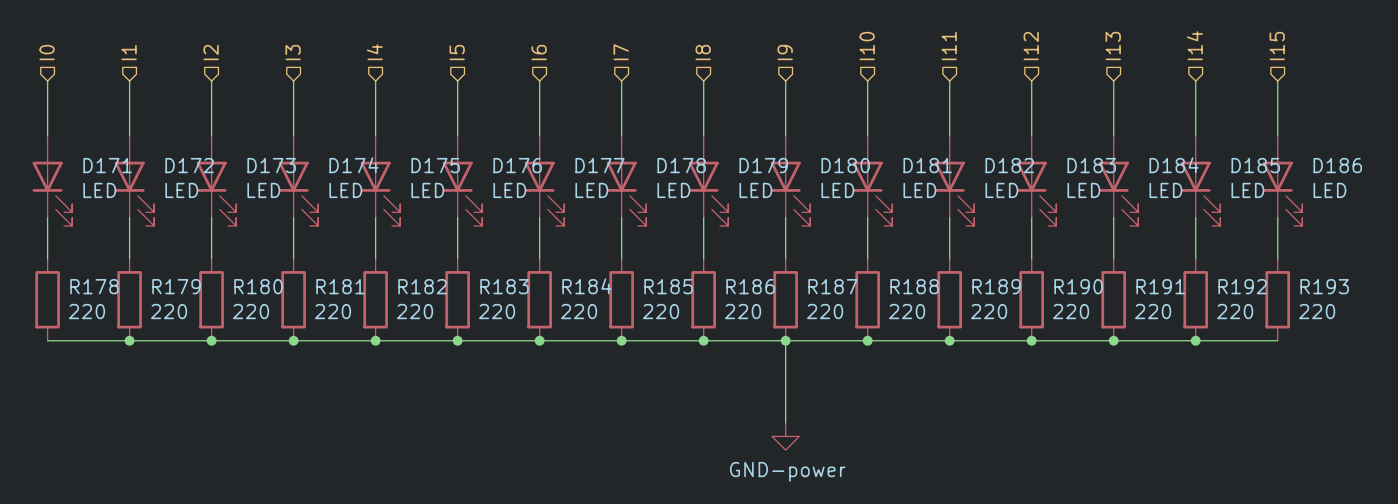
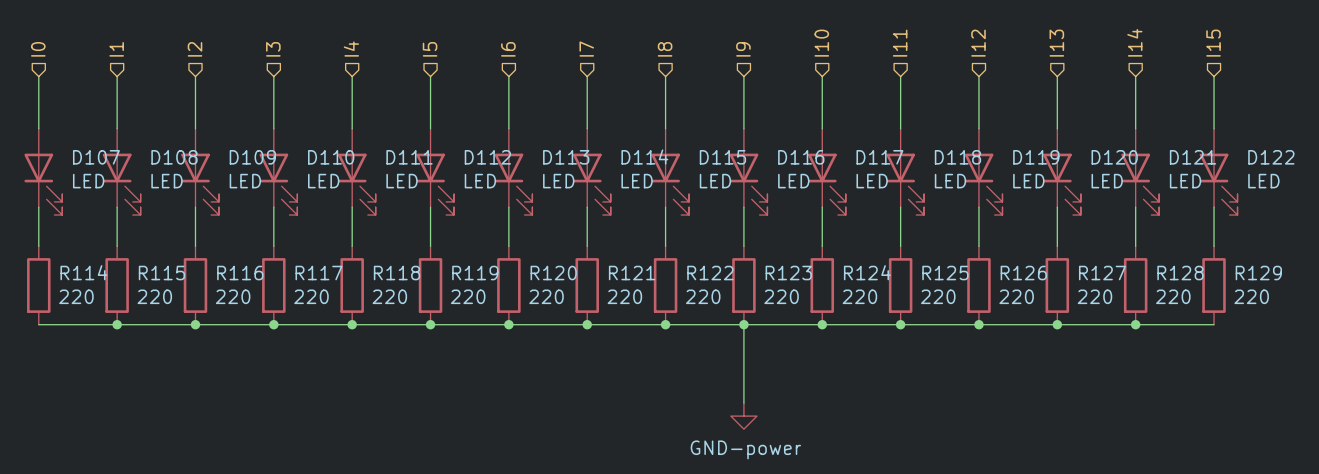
D171 name: D171 (107, 165) -> D107 (96, 157)
D172 name: D172 (189, 165) -> D108 (174, 157)
D173 name: D173 (271, 165) -> D109 (252, 157)
D174 name: D174 (353, 165) -> D110 (331, 157)
D175 name: D175 (435, 165) -> D111 (409, 157)
D176 name: D176 (517, 165) -> D112 (487, 157)
D177 name: D177 (600, 165) -> D113 (566, 157)
D178 name: D178 (681, 165) -> D114 (644, 157)
D179 name: D179 (763, 165) -> D115 (722, 157)
D180 name: D180 (845, 165) -> D116 (801, 157)
D181 name: D181 (927, 165) -> D117 (879, 157)
D182 name: D182 (1009, 165) -> D118 (957, 157)
D183 name: D183 (1091, 165) -> D119 (1036, 157)
D184 name: D184 (1174, 165) -> D120 (1114, 157)
D185 name: D185 (1255, 165) -> D121 (1193, 157)
D186 name: D186 (1337, 165) -> D122 (1271, 157)
R178 name: R178 (94, 286) -> R114 (83, 272)
R179 name: R179 (176, 286) -> R115 (161, 273)
R180 name: R180 (258, 286) -> R116 (240, 273)
R181 name: R181 (340, 286) -> R117 (318, 273)
R182 name: R182 (422, 286) -> R118 (396, 273)
R183 name: R183 (504, 286) -> R119 (475, 273)
R184 name: R184 (586, 286) -> R120 (553, 273)
R185 name: R185 (668, 286) -> R121 (632, 273)
R186 name: R186 (750, 286) -> R122 (710, 273)
R187 name: R187 (832, 286) -> R123 (788, 273)
R188 name: R188 (914, 286) -> R124 (867, 272)
R189 name: R189 (996, 286) -> R125 (945, 273)
R190 name: R190 (1078, 286) -> R126 (1023, 273)
R191 name: R191 (1160, 286) -> R127 (1102, 273)
R192 name: R192 (1242, 286) -> R128 (1180, 273)
R193 name: R193 (1324, 286) -> R129 (1258, 273)

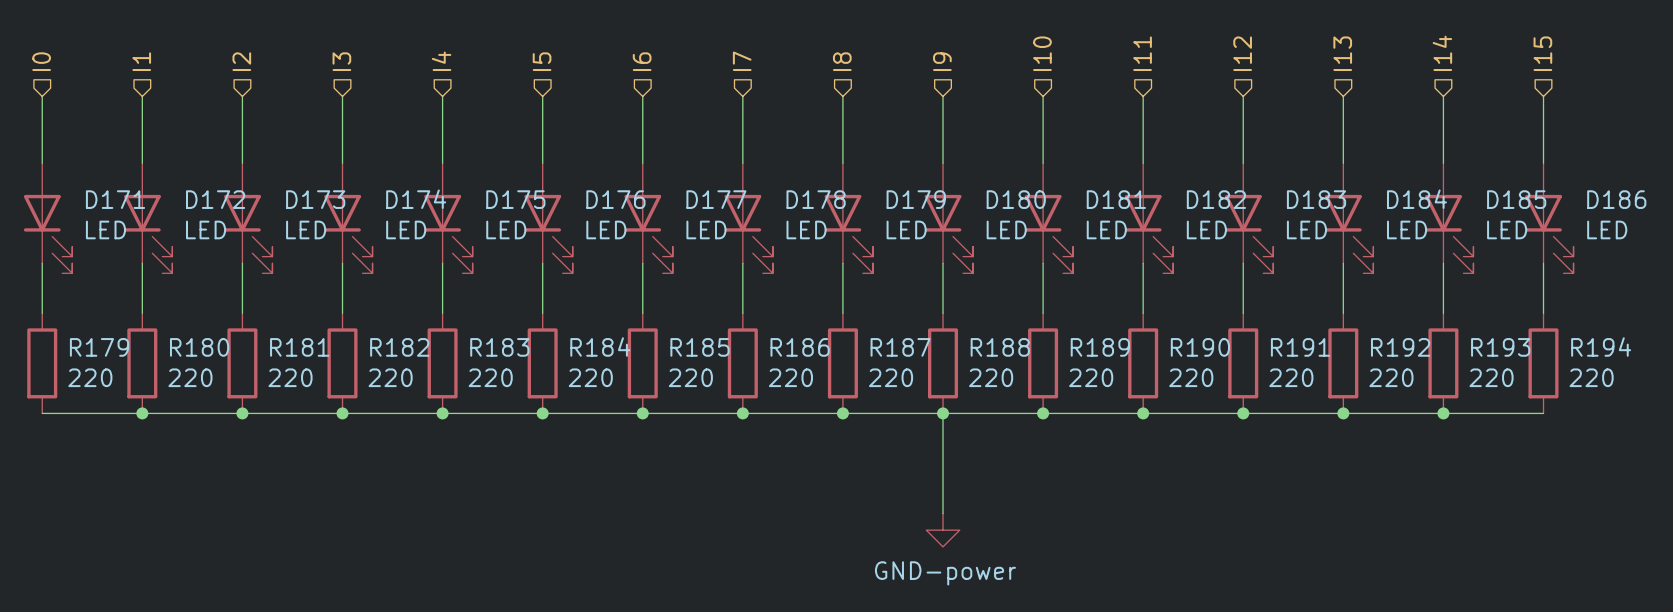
D107 name: D107 (96, 157) -> D171 (115, 199)
D108 name: D108 (174, 157) -> D172 (215, 199)
D109 name: D109 (252, 157) -> D173 (315, 199)
D110 name: D110 (331, 157) -> D174 (416, 199)
D111 name: D111 (409, 157) -> D175 (515, 199)
D112 name: D112 (487, 157) -> D176 (615, 199)
D113 name: D113 (566, 157) -> D177 (716, 199)
D114 name: D114 (644, 157) -> D178 (816, 199)
D115 name: D115 (722, 157) -> D179 (916, 199)
D116 name: D116 (801, 157) -> D180 (1016, 199)
D117 name: D117 (879, 157) -> D181 (1116, 199)
D118 name: D118 (957, 157) -> D182 (1216, 199)
D119 name: D119 (1036, 157) -> D183 (1316, 199)
D120 name: D120 (1114, 157) -> D184 (1416, 199)
D121 name: D121 (1193, 157) -> D185 (1516, 199)
D122 name: D122 (1271, 157) -> D186 (1616, 199)
R114 name: R114 (83, 272) -> R179 (99, 347)
R124 name: R124 (867, 272) -> R189 (1100, 347)
R115 name: R115 (161, 273) -> R180 (199, 347)
R116 name: R116 (240, 273) -> R181 (299, 347)
R117 name: R117 (318, 273) -> R182 (399, 347)
R118 name: R118 (396, 273) -> R183 (499, 347)
R119 name: R119 (475, 273) -> R184 (600, 347)
R120 name: R120 (553, 273) -> R185 (699, 347)
R121 name: R121 (632, 273) -> R186 (800, 347)
R122 name: R122 (710, 273) -> R187 (900, 347)
R123 name: R123 (788, 273) -> R188 (1000, 347)
R125 name: R125 (945, 273) -> R190 (1200, 347)
R126 name: R126 (1023, 273) -> R191 (1300, 347)
R127 name: R127 (1102, 273) -> R192 (1400, 347)
R128 name: R128 (1180, 273) -> R193 (1500, 347)
R129 name: R129 (1258, 273) -> R194 (1601, 347)

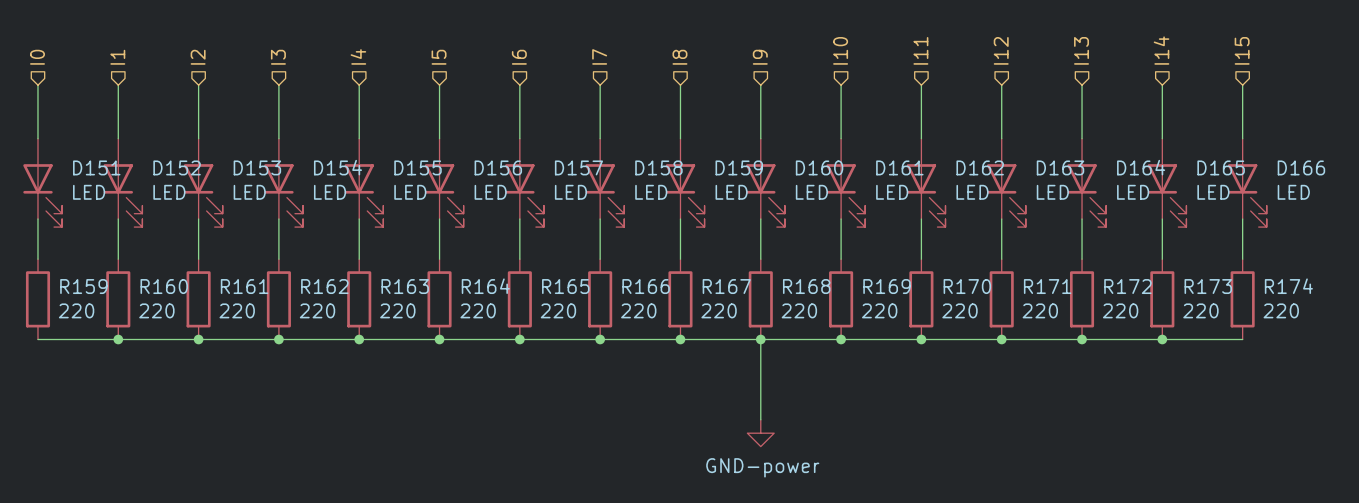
D171 name: D171 (115, 199) -> D151 (96, 167)
D172 name: D172 (215, 199) -> D152 (177, 167)
D173 name: D173 (315, 199) -> D153 (257, 167)
D174 name: D174 (416, 199) -> D154 (338, 167)
D175 name: D175 (515, 199) -> D155 (418, 167)
D176 name: D176 (615, 199) -> D156 (498, 167)
D177 name: D177 (716, 199) -> D157 (578, 167)
D178 name: D178 (816, 199) -> D158 (658, 167)
D179 name: D179 (916, 199) -> D159 (739, 167)
D180 name: D180 (1016, 199) -> D160 (819, 167)
D181 name: D181 (1116, 199) -> D161 (899, 167)
D182 name: D182 (1216, 199) -> D162 (980, 167)
D183 name: D183 (1316, 199) -> D163 (1060, 167)
D184 name: D184 (1416, 199) -> D164 (1141, 167)
D185 name: D185 (1516, 199) -> D165 (1221, 167)
D186 name: D186 (1616, 199) -> D166 (1301, 167)
R179 name: R179 (99, 347) -> R159 (83, 286)
R180 name: R180 (199, 347) -> R160 (164, 286)
R181 name: R181 (299, 347) -> R161 (244, 286)
R182 name: R182 (399, 347) -> R162 (324, 286)
R183 name: R183 (499, 347) -> R163 (405, 286)
R184 name: R184 (600, 347) -> R164 (485, 286)
R185 name: R185 (699, 347) -> R165 (565, 286)
R186 name: R186 (800, 347) -> R166 (646, 286)
R187 name: R187 (900, 347) -> R167 (726, 286)
R188 name: R188 (1000, 347) -> R168 (806, 286)
R189 name: R189 (1100, 347) -> R169 (887, 286)
R190 name: R190 (1200, 347) -> R170 (967, 286)
R191 name: R191 (1300, 347) -> R171 (1047, 286)
R192 name: R192 (1400, 347) -> R172 (1127, 286)
R193 name: R193 (1500, 347) -> R173 (1208, 286)
R194 name: R194 (1601, 347) -> R174 (1288, 286)

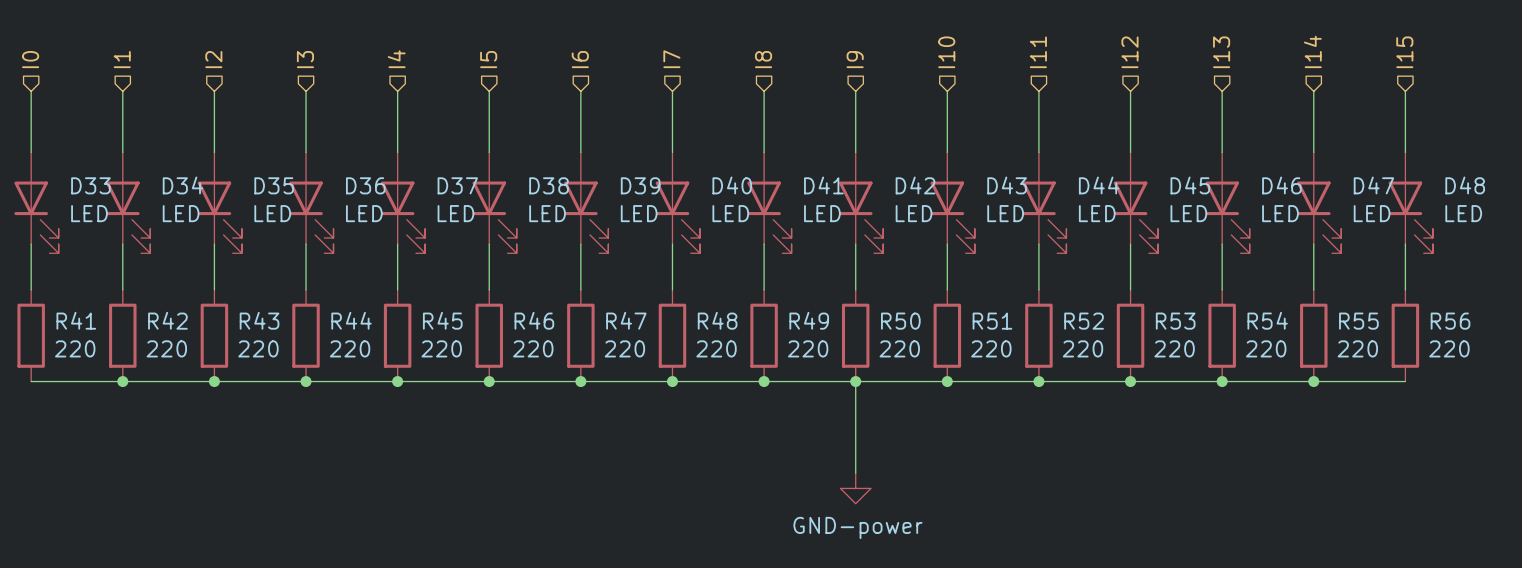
D151 name: D151 (96, 167) -> D33 (90, 185)
D152 name: D152 (177, 167) -> D34 (182, 185)
D153 name: D153 (257, 167) -> D35 (274, 185)
D154 name: D154 (338, 167) -> D36 (365, 185)
D155 name: D155 (418, 167) -> D37 (457, 185)
D156 name: D156 (498, 167) -> D38 (549, 185)
D157 name: D157 (578, 167) -> D39 (640, 185)
D158 name: D158 (658, 167) -> D40 (732, 185)
D159 name: D159 (739, 167) -> D41 (823, 185)
D160 name: D160 (819, 167) -> D42 (915, 185)
D161 name: D161 (899, 167) -> D43 (1007, 185)
D162 name: D162 (980, 167) -> D44 (1099, 185)
D163 name: D163 (1060, 167) -> D45 (1190, 185)
D164 name: D164 (1141, 167) -> D46 (1281, 185)
D165 name: D165 (1221, 167) -> D47 (1373, 185)
D166 name: D166 (1301, 167) -> D48 (1465, 185)
R159 name: R159 (83, 286) -> R41 (76, 320)
R160 name: R160 (164, 286) -> R42 (167, 320)
R161 name: R161 (244, 286) -> R43 (259, 320)
R162 name: R162 (324, 286) -> R44 (351, 320)
R163 name: R163 (405, 286) -> R45 (442, 320)
R164 name: R164 (485, 286) -> R46 (534, 320)
R165 name: R165 (565, 286) -> R47 (626, 320)
R166 name: R166 (646, 286) -> R48 (717, 320)
R167 name: R167 (726, 286) -> R49 (809, 320)
R168 name: R168 (806, 286) -> R50 (900, 321)
R169 name: R169 (887, 286) -> R51 (992, 321)
R170 name: R170 (967, 286) -> R52 (1084, 321)
R171 name: R171 (1047, 286) -> R53 (1175, 321)
R172 name: R172 (1127, 286) -> R54 (1267, 320)
R173 name: R173 (1208, 286) -> R55 (1358, 321)
R174 name: R174 (1288, 286) -> R56 (1450, 321)

